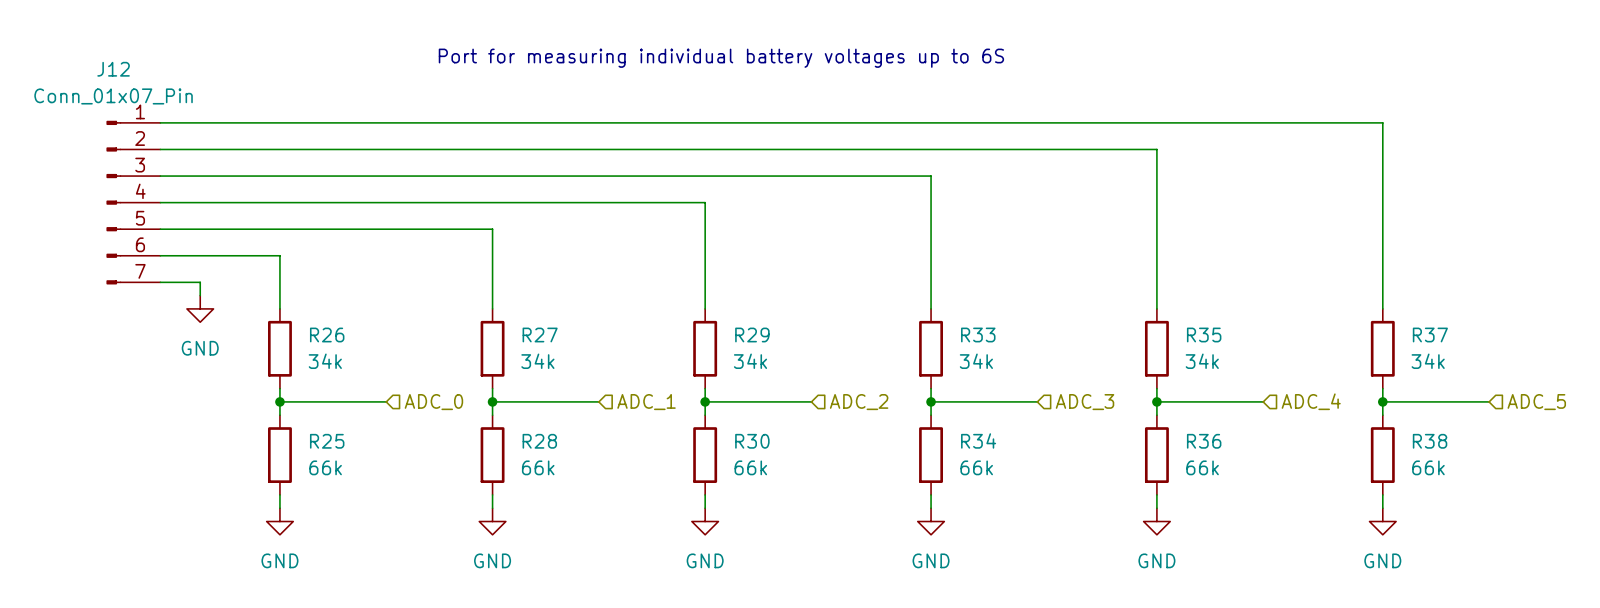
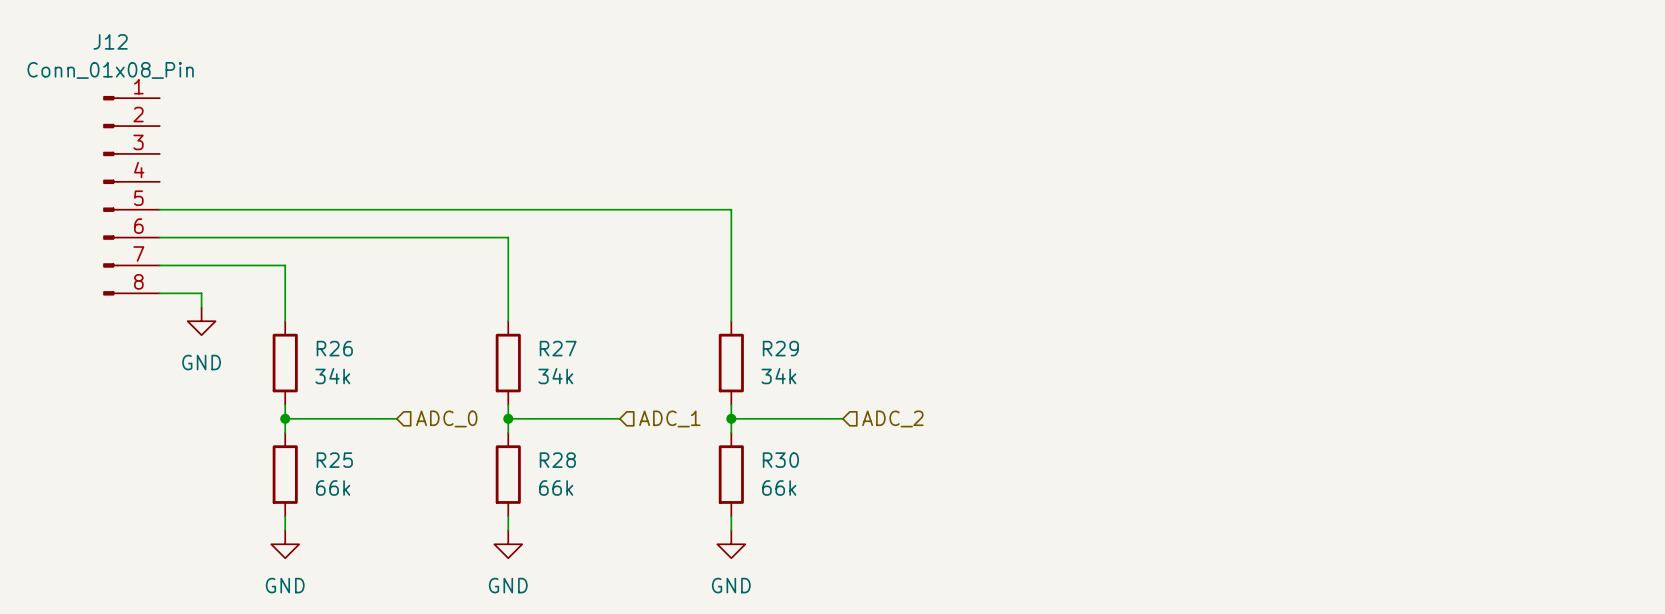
text: Port for measuring individual battery voltages up to 6S (721, 58) -> none
J12 value: Conn_01x07_Pin (113, 96) -> Conn_01x08_Pin (110, 70)
J12 symbol: [106, 120, 161, 285] -> [103, 95, 160, 296]
wire: (160, 122) (1382, 122) (1382, 308) -> none
wire: (160, 149) (1156, 149) (1156, 308) -> none
wire: (160, 176) (931, 176) (931, 308) -> none
R33: 34k (931, 348) -> none
R35: 34k (1156, 348) -> none
R37: 34k (1382, 348) -> none
wire: (931, 388) (931, 415) -> none
wire: (1156, 388) (1156, 415) -> none
wire: (1382, 388) (1382, 415) -> none
wire: (931, 401) (1037, 401) -> none
junction: (931, 401) -> none
wire: (1156, 401) (1263, 401) -> none
junction: (1156, 401) -> none
hierarchical label: ADC_4 (1311, 401) -> none
wire: (1382, 401) (1489, 401) -> none
junction: (1382, 401) -> none
hierarchical label: ADC_3 (1085, 402) -> none
hierarchical label: ADC_5 (1536, 402) -> none
R34: 66k (931, 455) -> none
R36: 66k (1156, 455) -> none
R38: 66k (1382, 455) -> none
wire: (931, 494) (931, 508) -> none
wire: (1156, 494) (1156, 508) -> none
wire: (1382, 494) (1382, 508) -> none
power symbol: GND (931, 521) -> none
power symbol: GND (1156, 521) -> none
power symbol: GND (1382, 521) -> none

